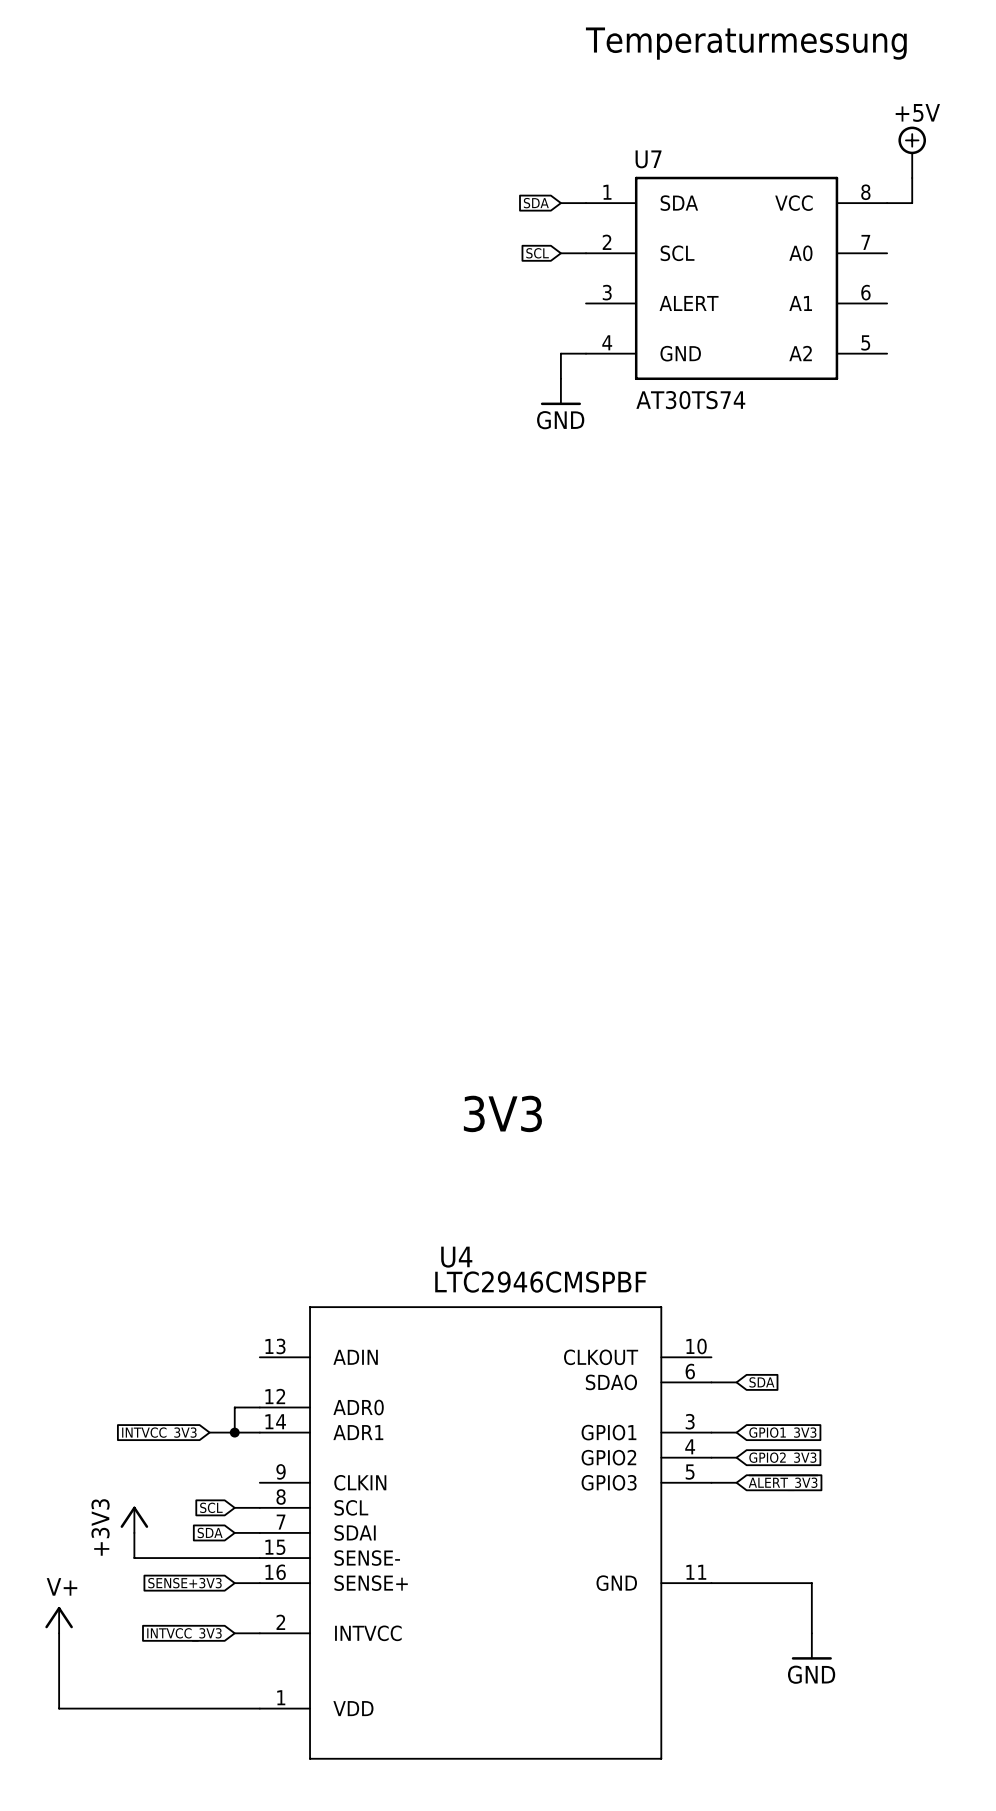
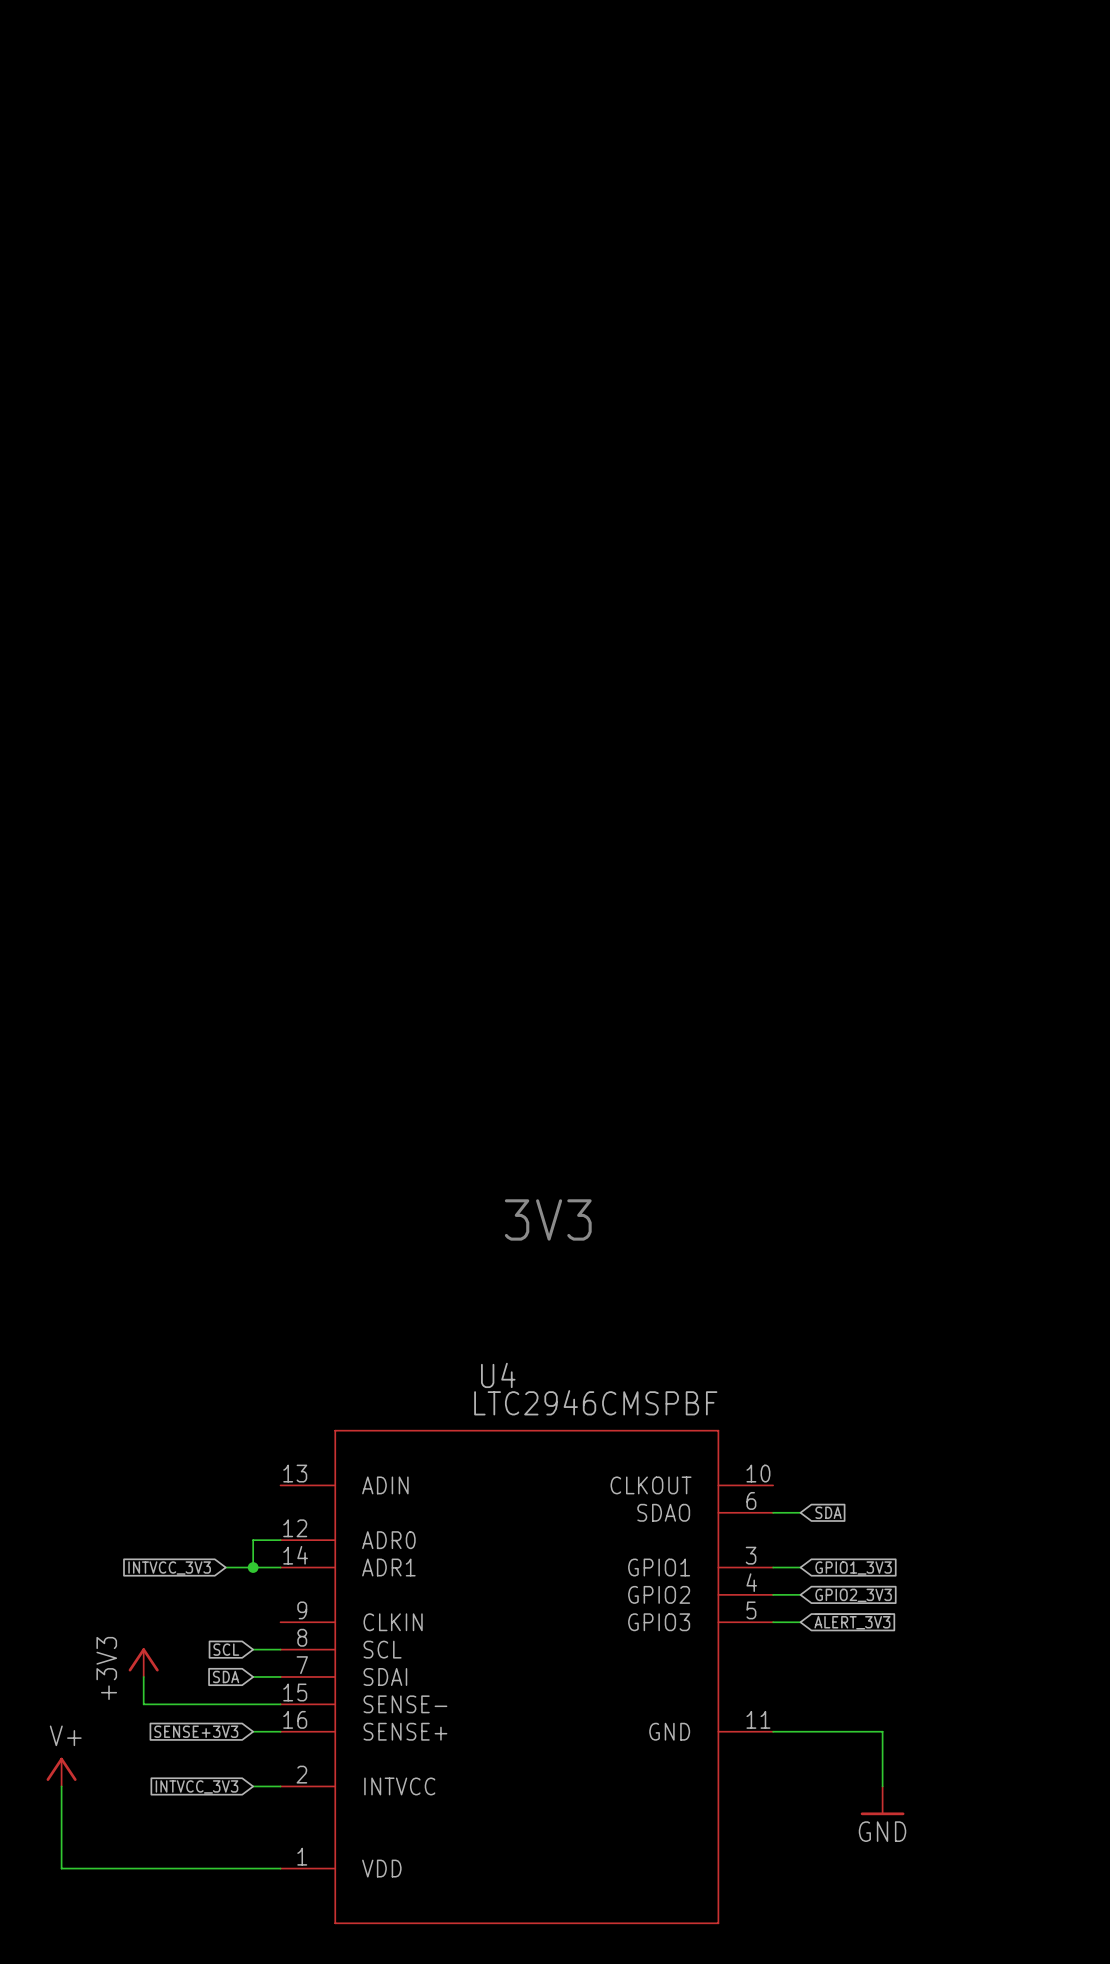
text: Temperaturmessung (746, 43) -> none
power symbol: +5V (912, 152) -> none
wire: (912, 178) (912, 203) (887, 203) -> none
global label: SDA (536, 203) -> none
wire: (560, 203) (586, 203) -> none
global label: SCL (537, 253) -> none
wire: (560, 253) (586, 253) -> none
U7: (736, 278) -> none
wire: (586, 353) (560, 353) (560, 378) -> none
power symbol: GND (560, 391) -> none

